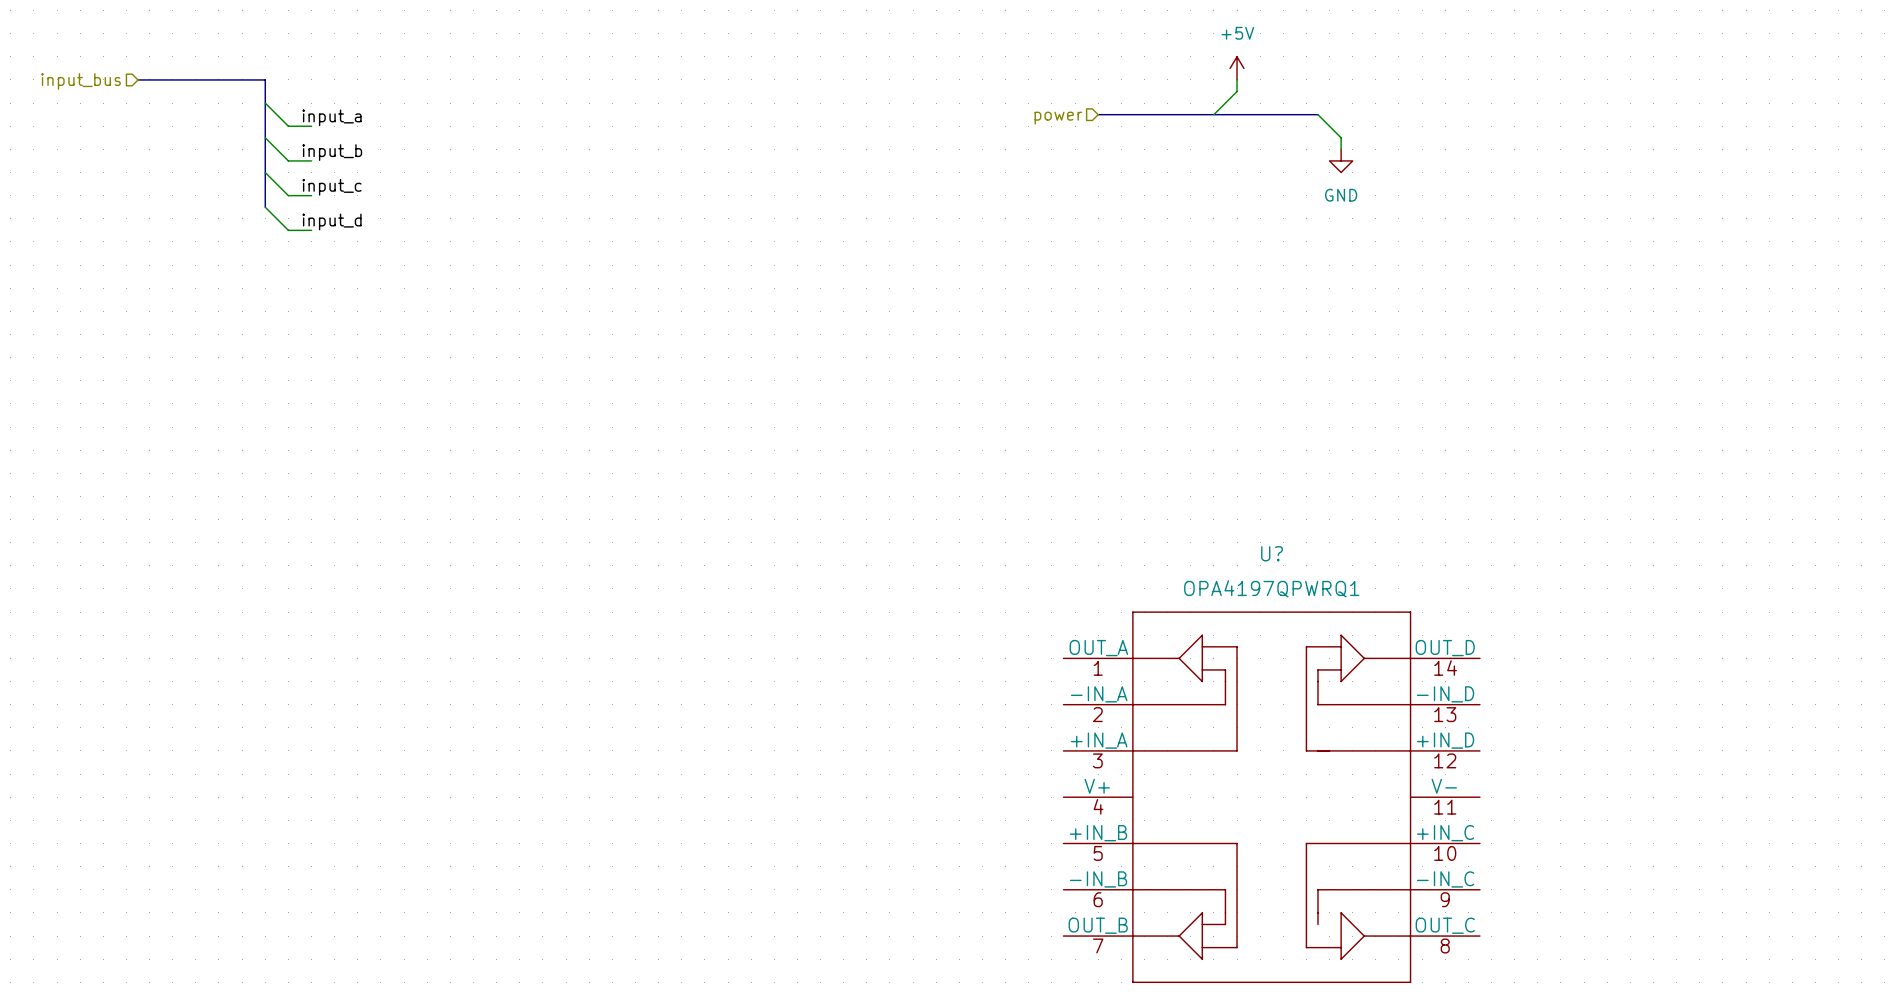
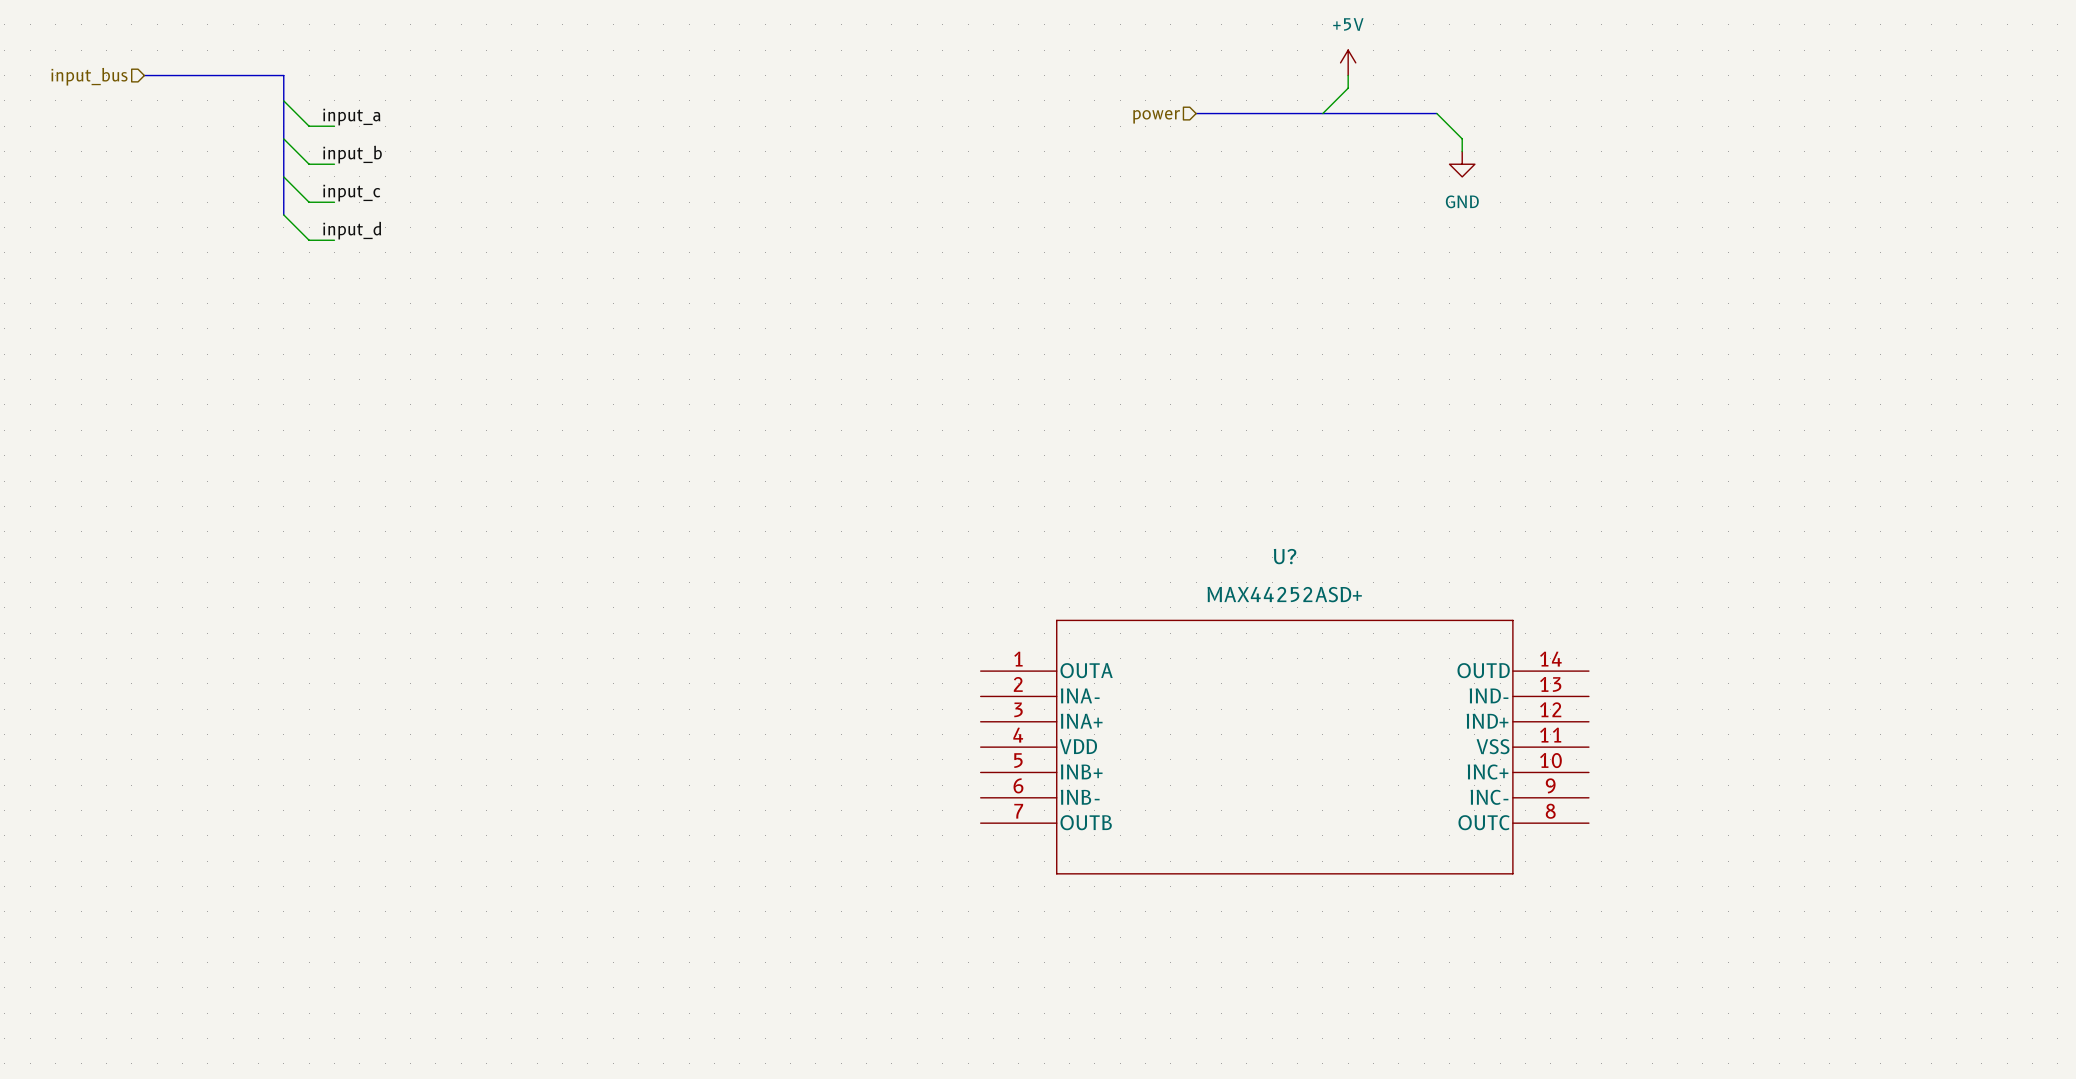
U?: none -> MAX44252ASD+ (1284, 747)
U?: OPA4197QPWRQ1 (1271, 797) -> none

